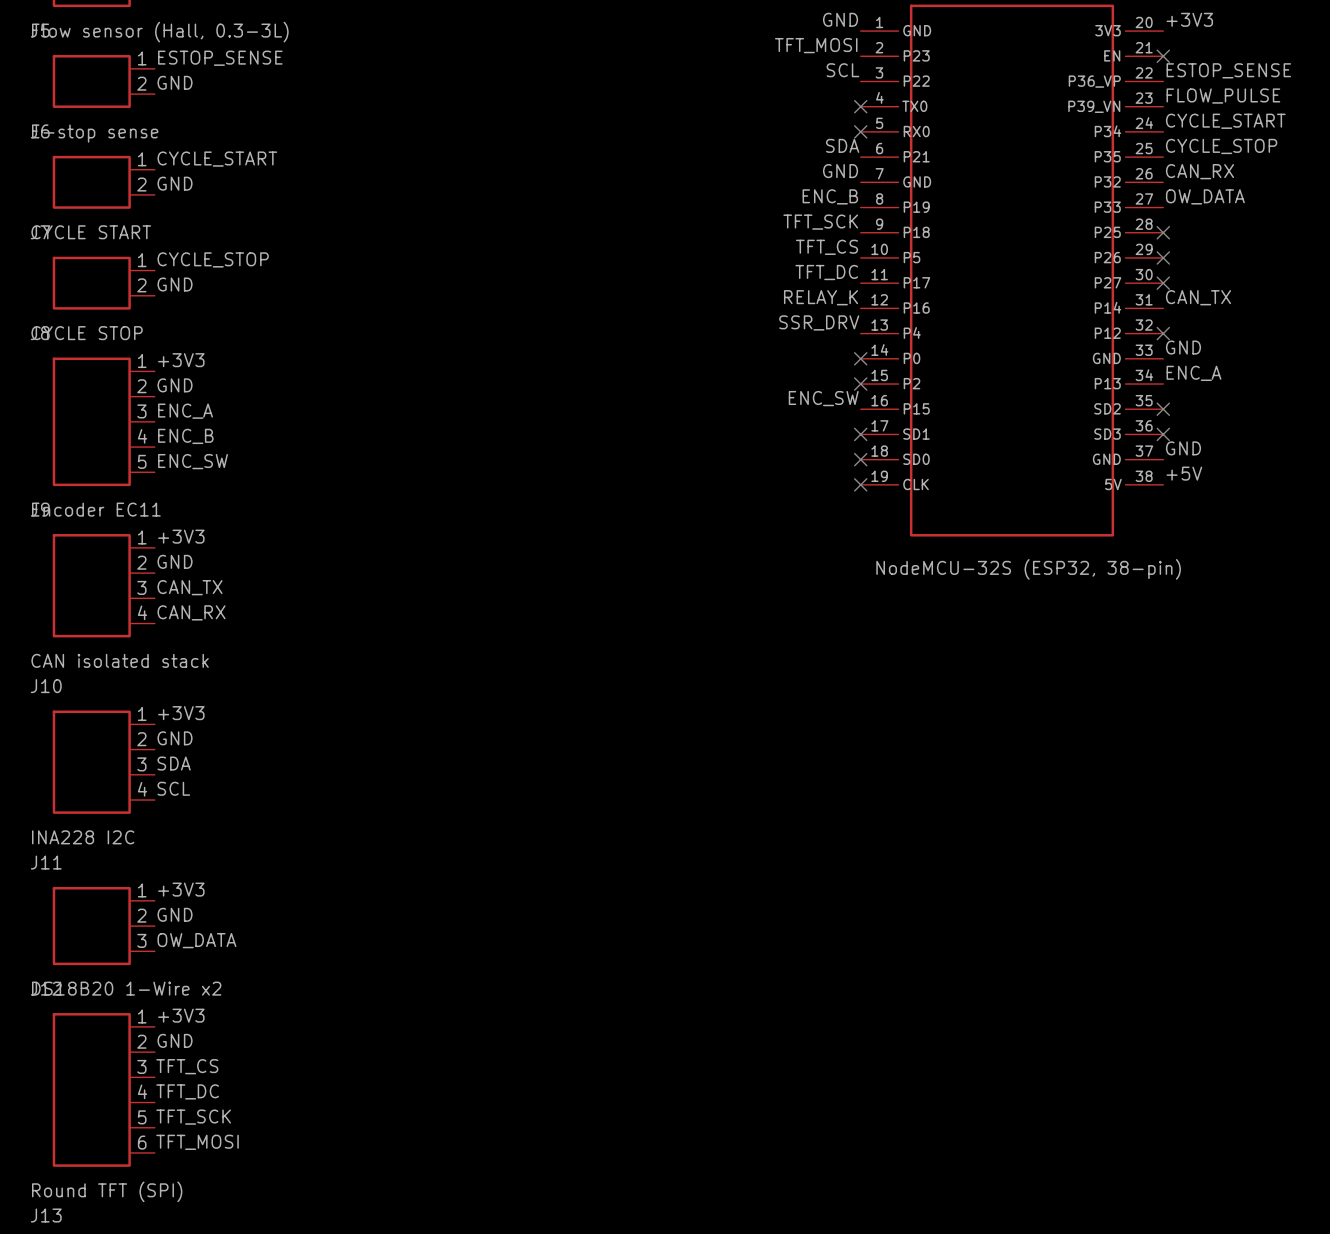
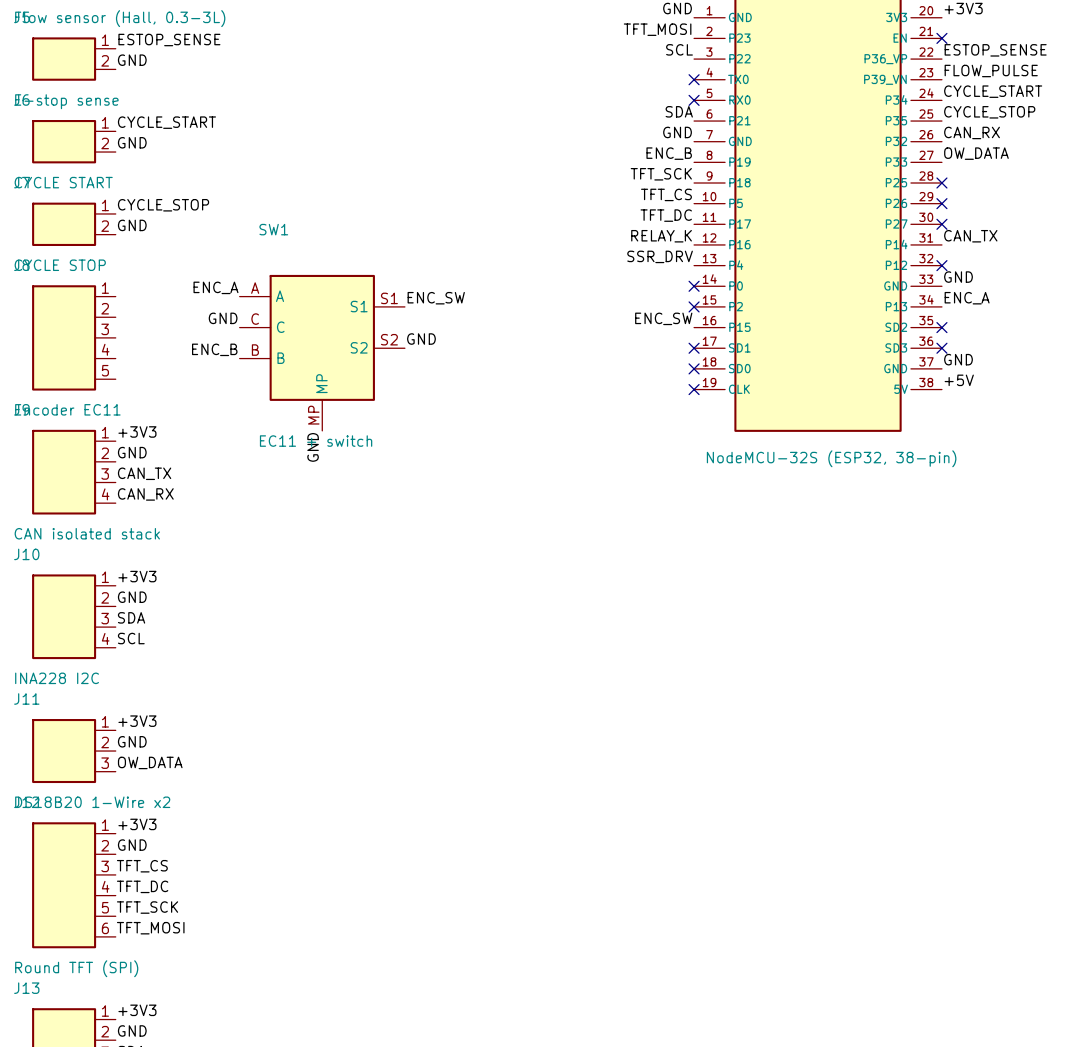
label: +3V3 (181, 360) -> none
label: none -> ENC_SW (436, 298)
label: GND (175, 385) -> none
label: none -> GND (223, 318)
label position: ENC_A (185, 411) -> ENC_A (215, 287)
label: none -> GND (421, 339)
label position: ENC_B (185, 436) -> ENC_B (214, 349)
SW1: none -> EC11 + switch (322, 352)
label: ENC_SW (193, 461) -> none
label: none -> GND (313, 447)

